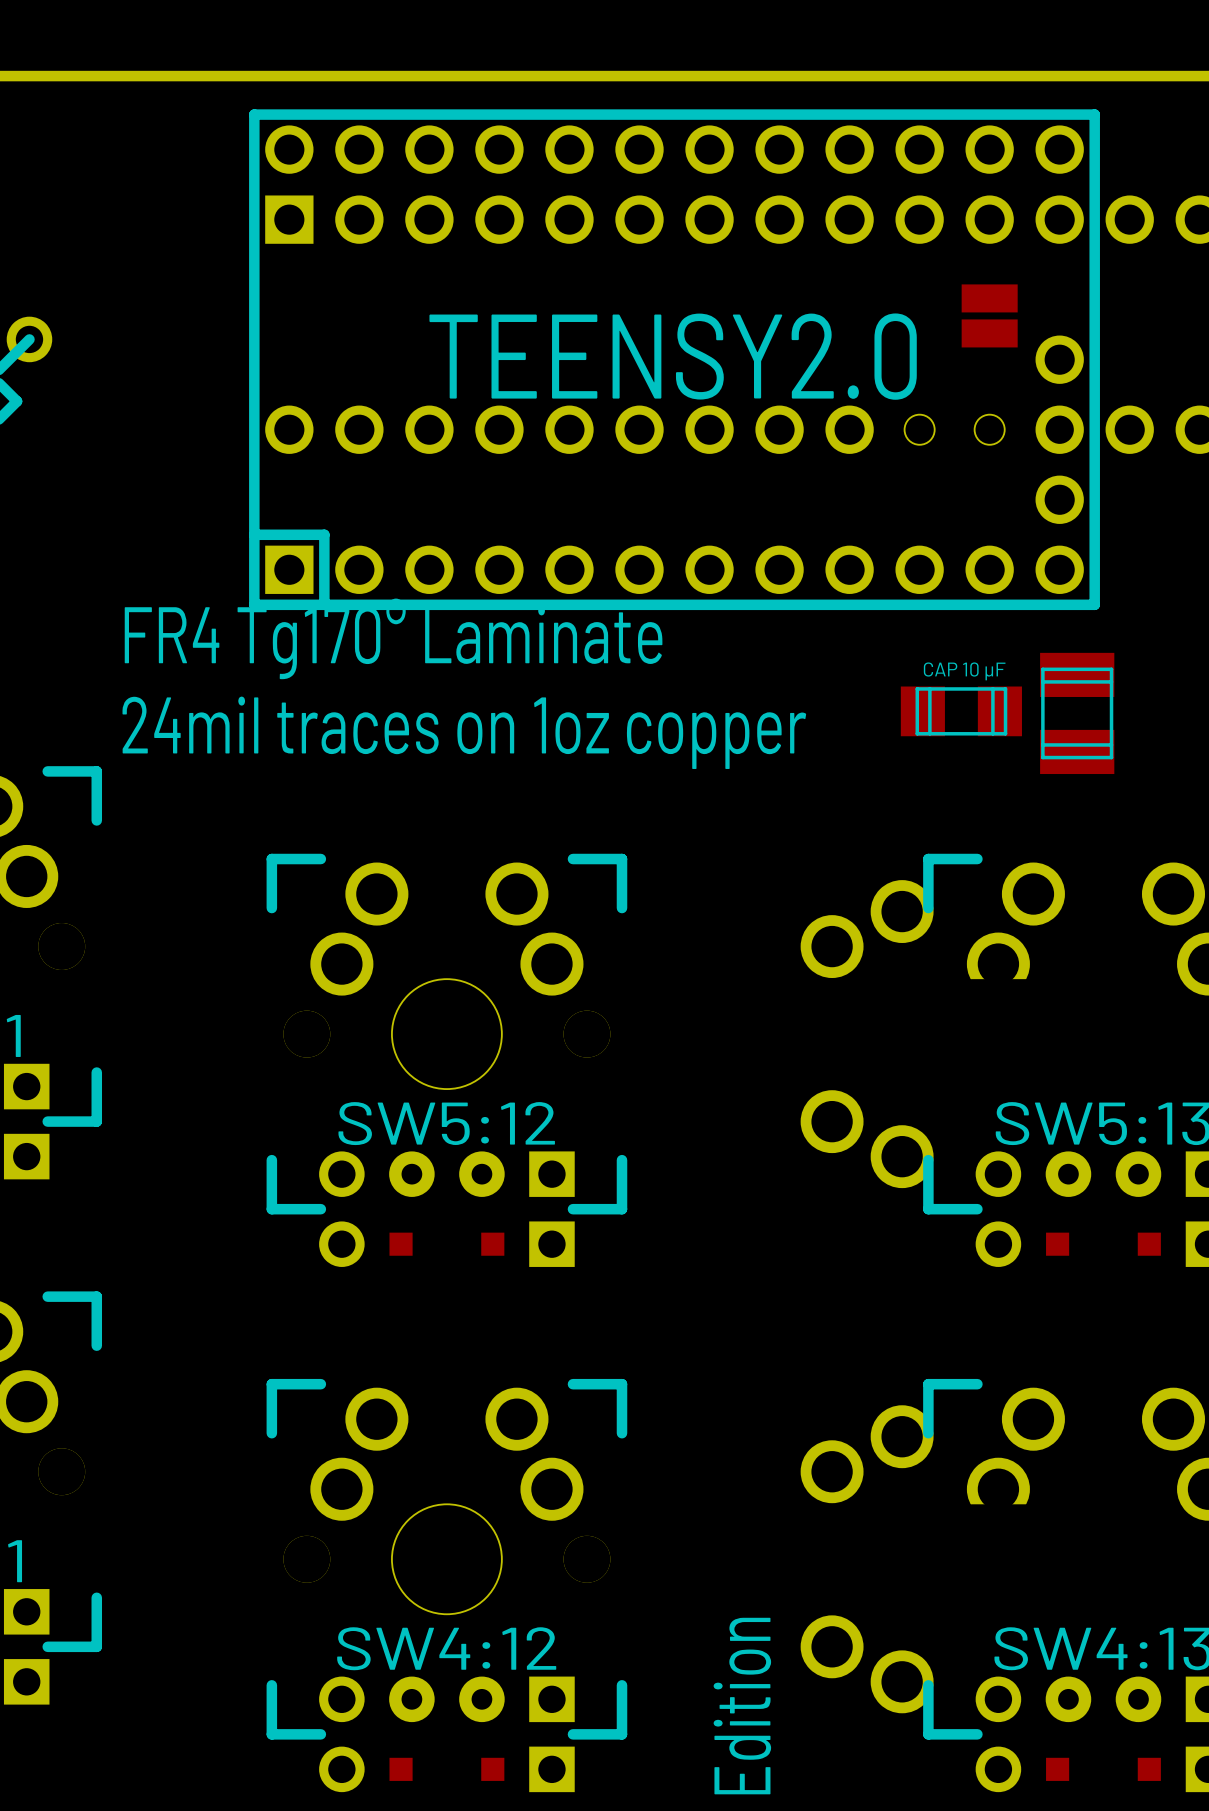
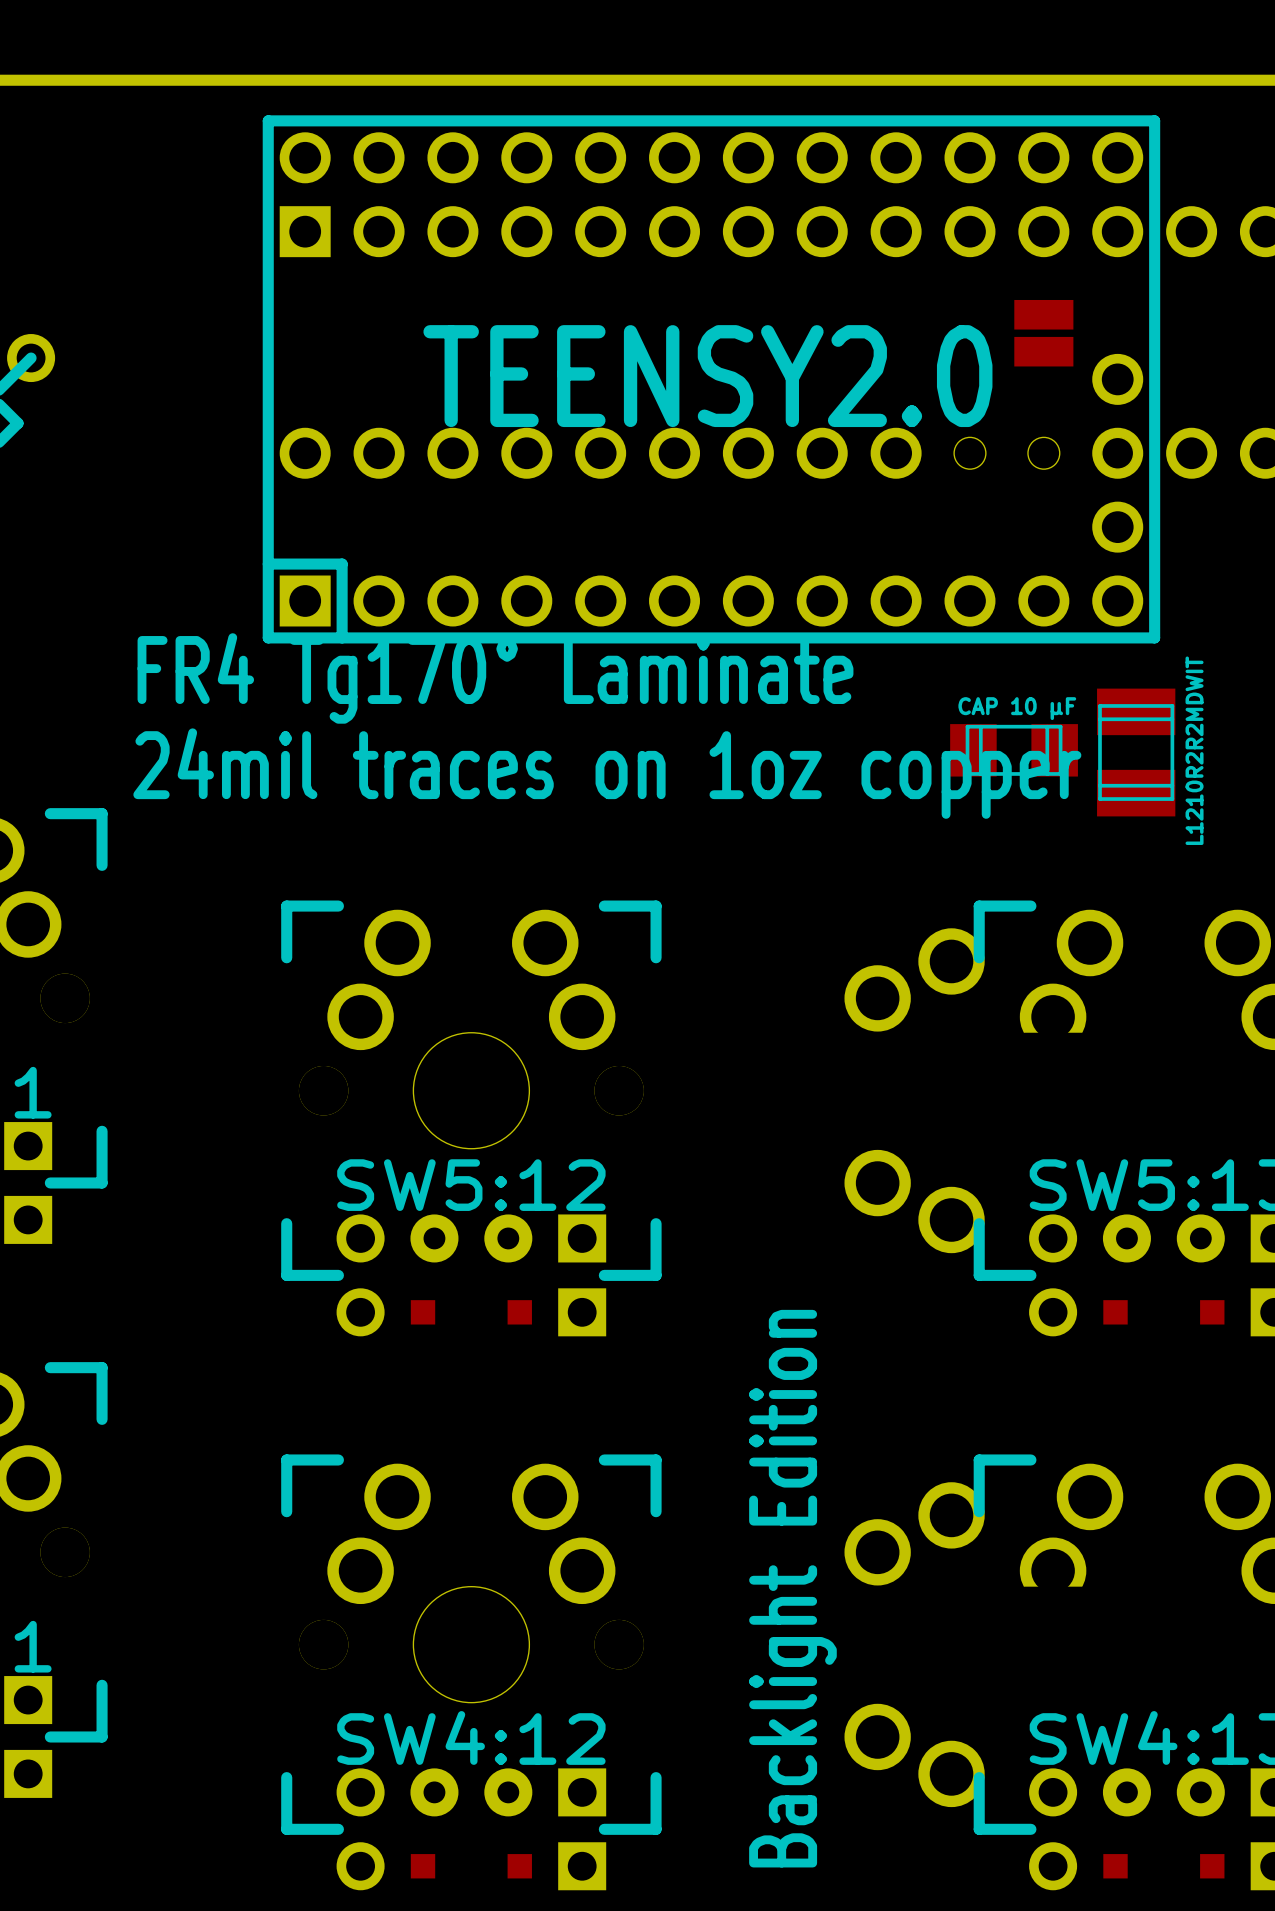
L1210R2R2MDWIT name: none -> L1210R2R2MDWIT (1194, 750)

